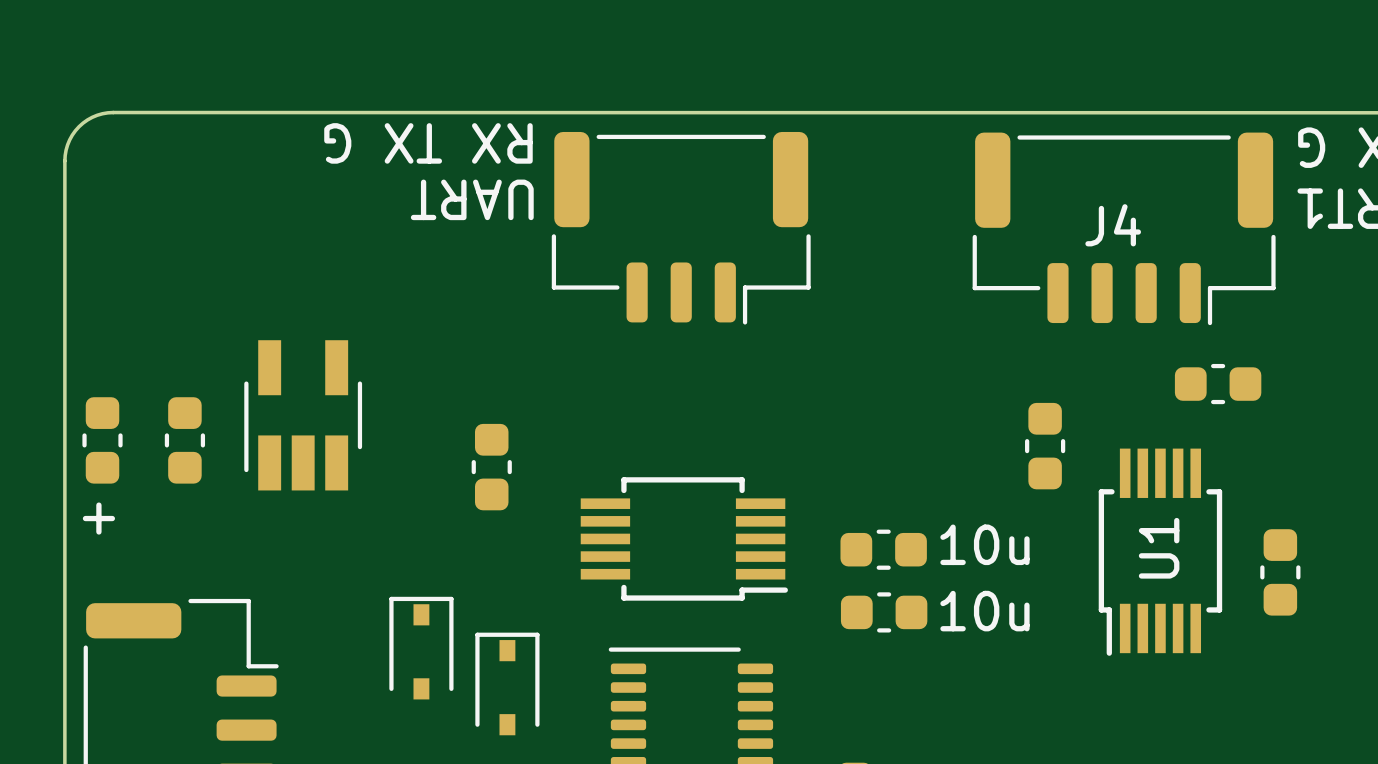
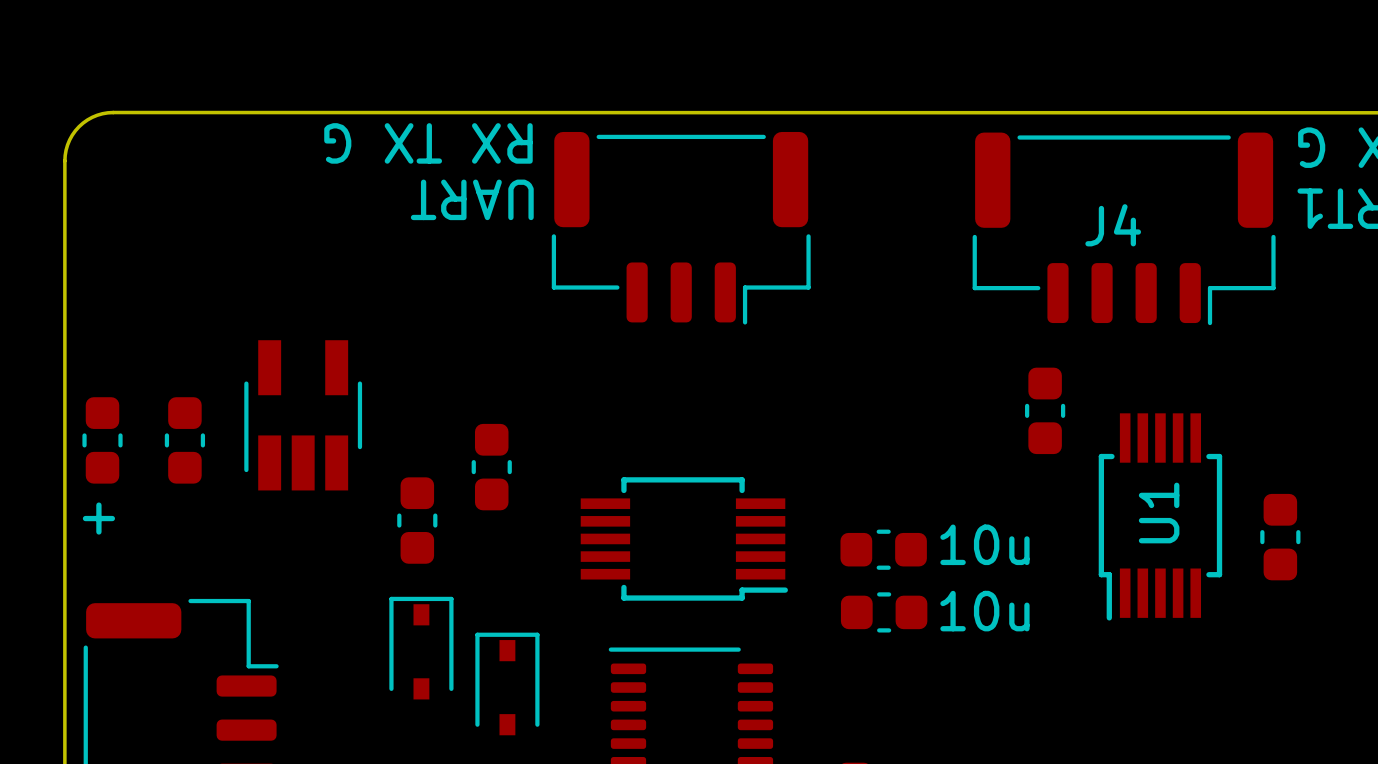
part rotation: 0° (1218, 384) -> 90° clockwise (417, 520)
part position: (1218, 384) -> (417, 520)
part position: (1045, 446) -> (1045, 410)
U1 position: (1160, 552) -> (1160, 516)
part position: (1280, 572) -> (1280, 537)

